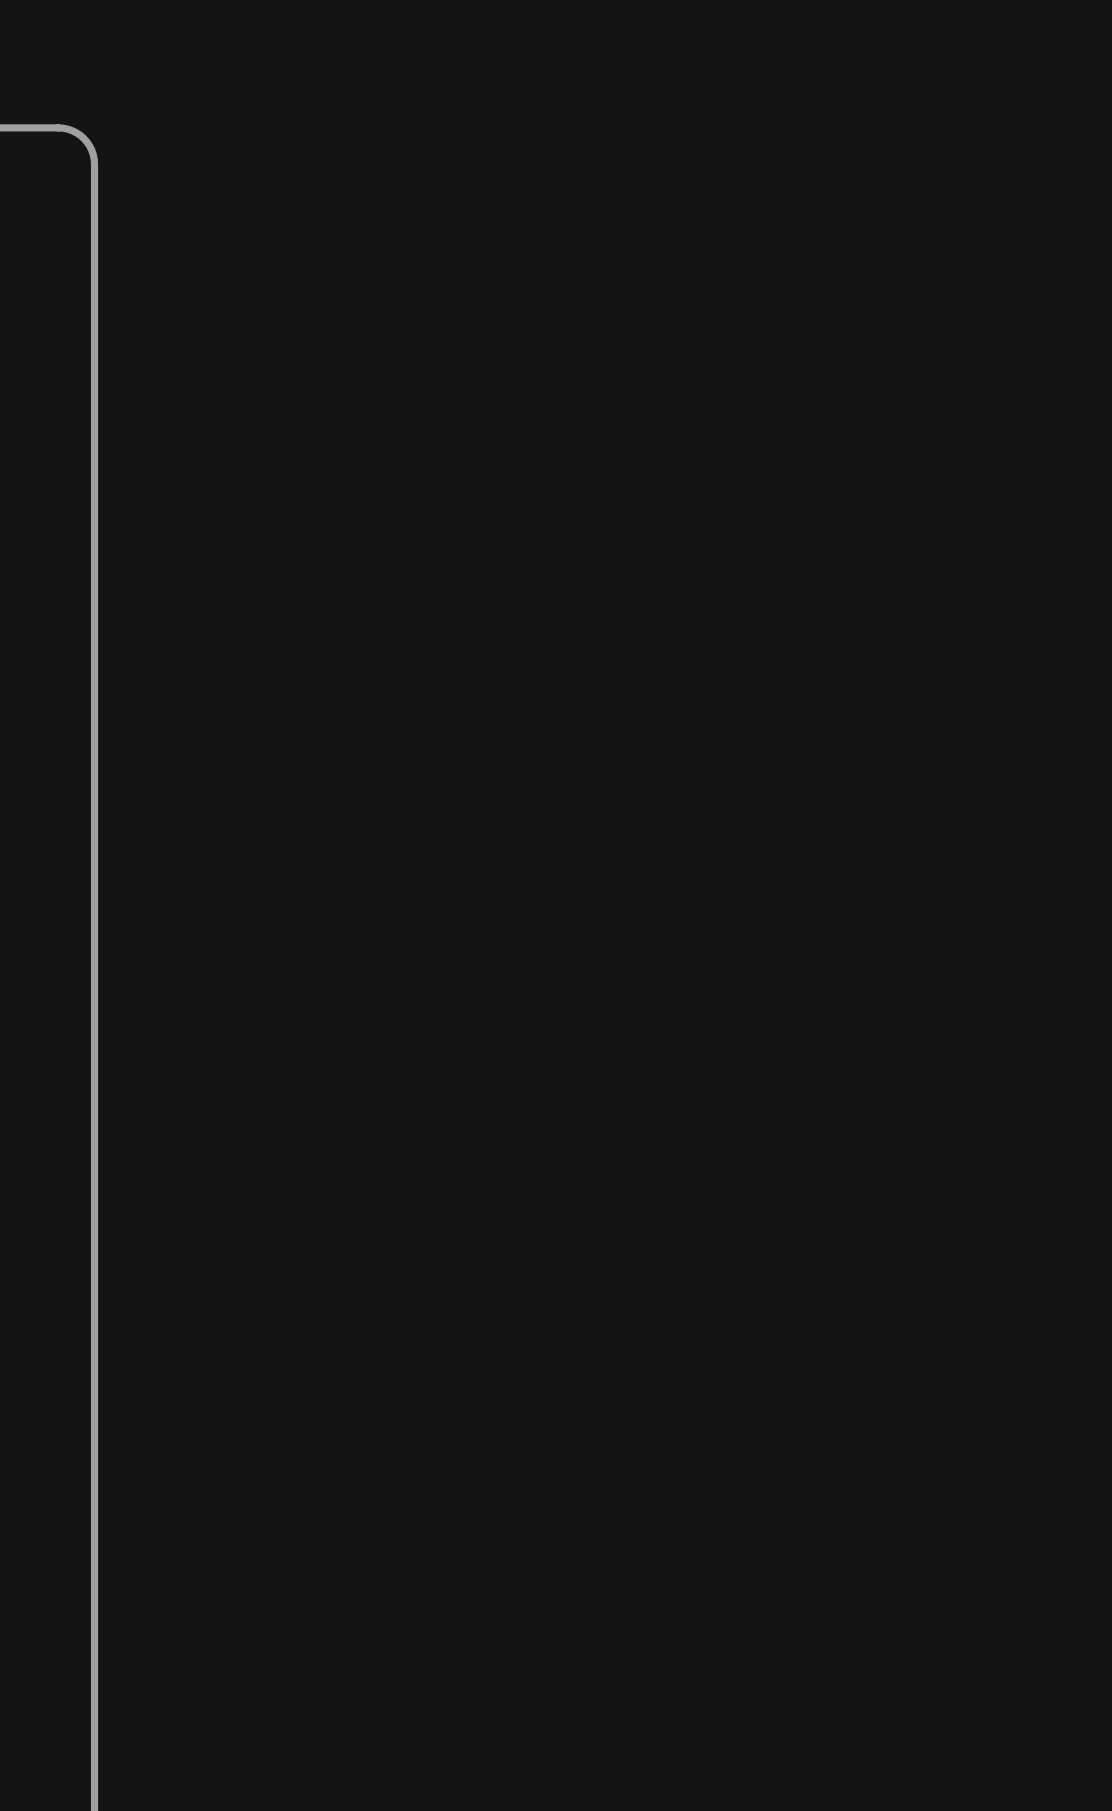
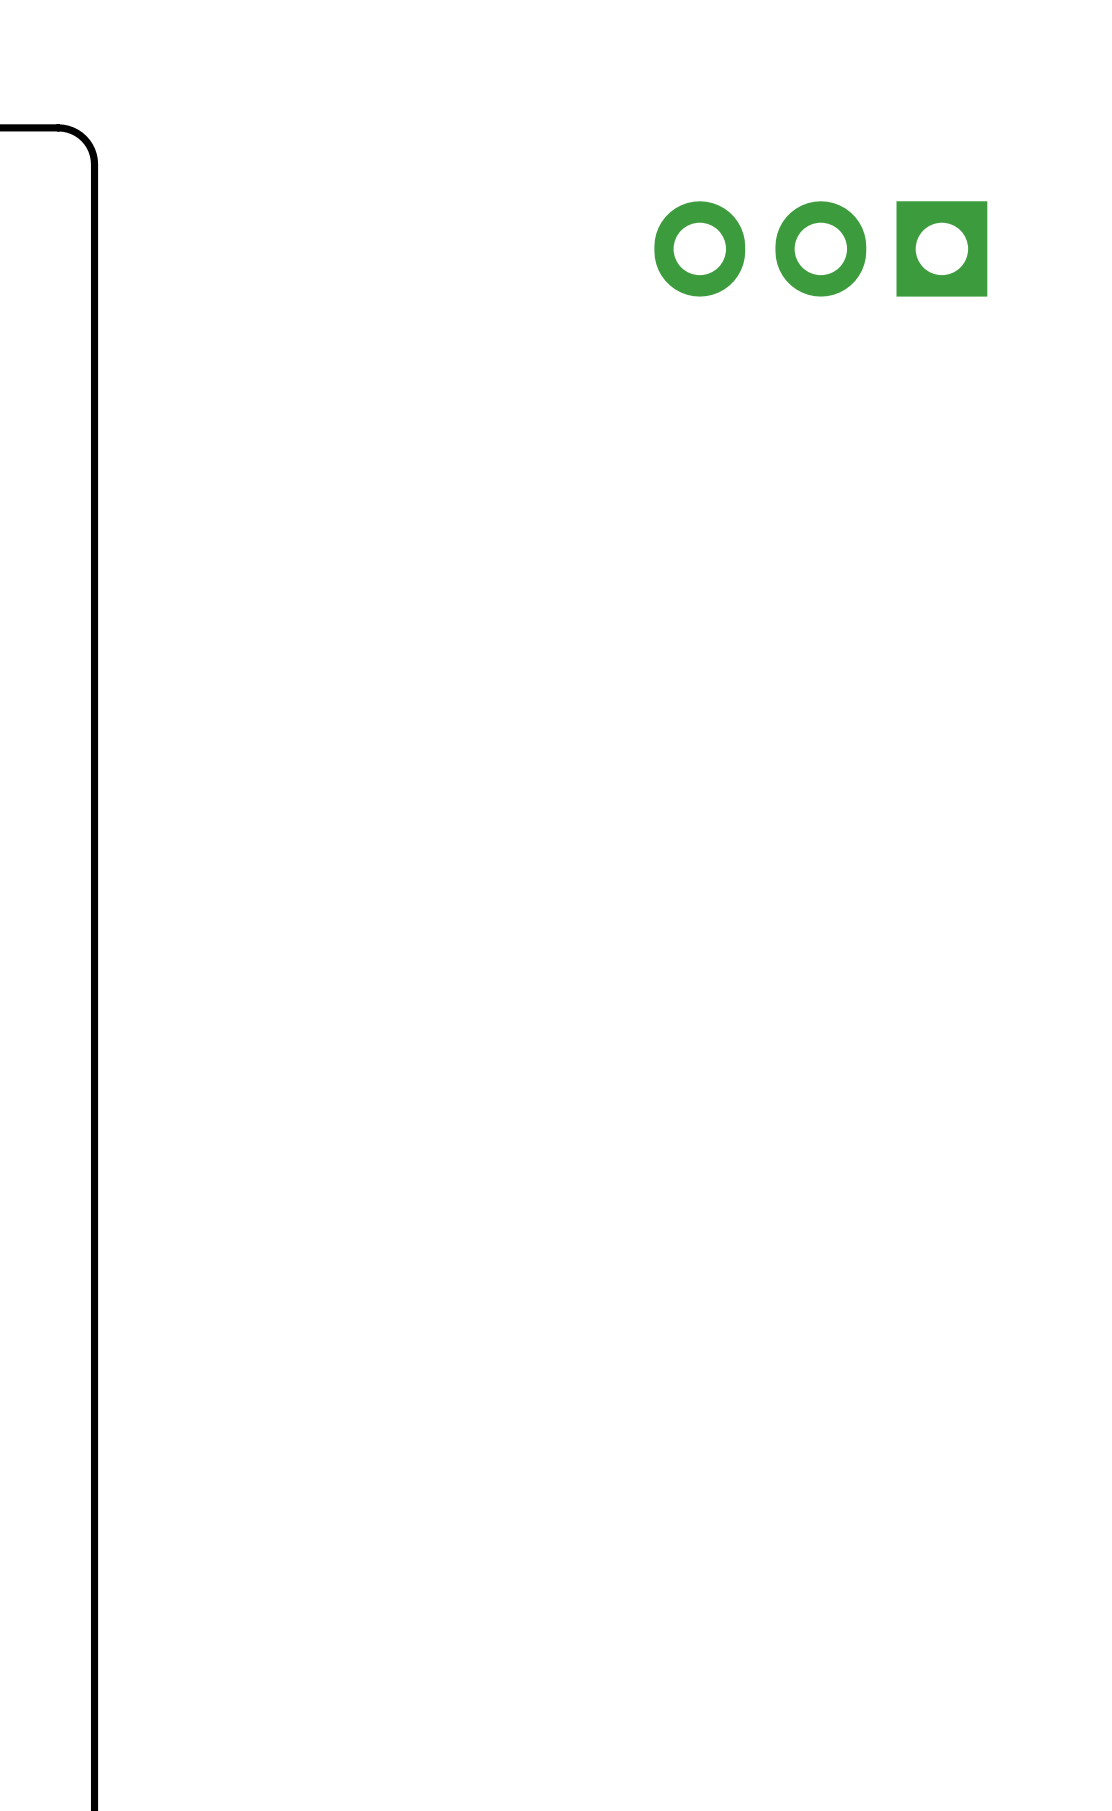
part: none -> (820, 248)

